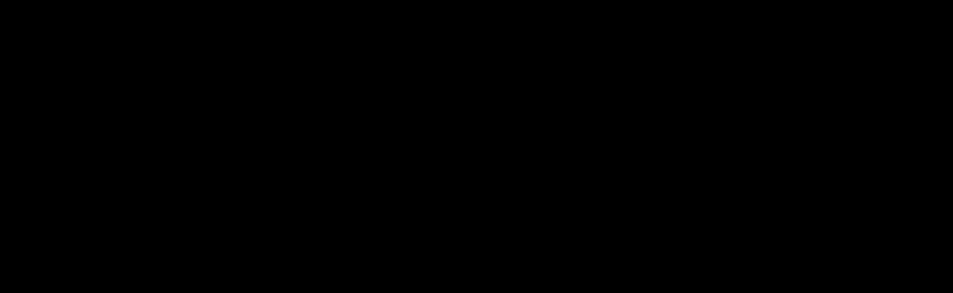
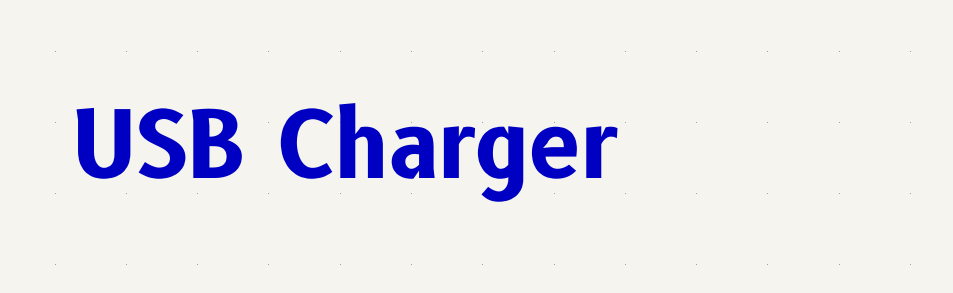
text: none -> USB Charger (347, 152)

